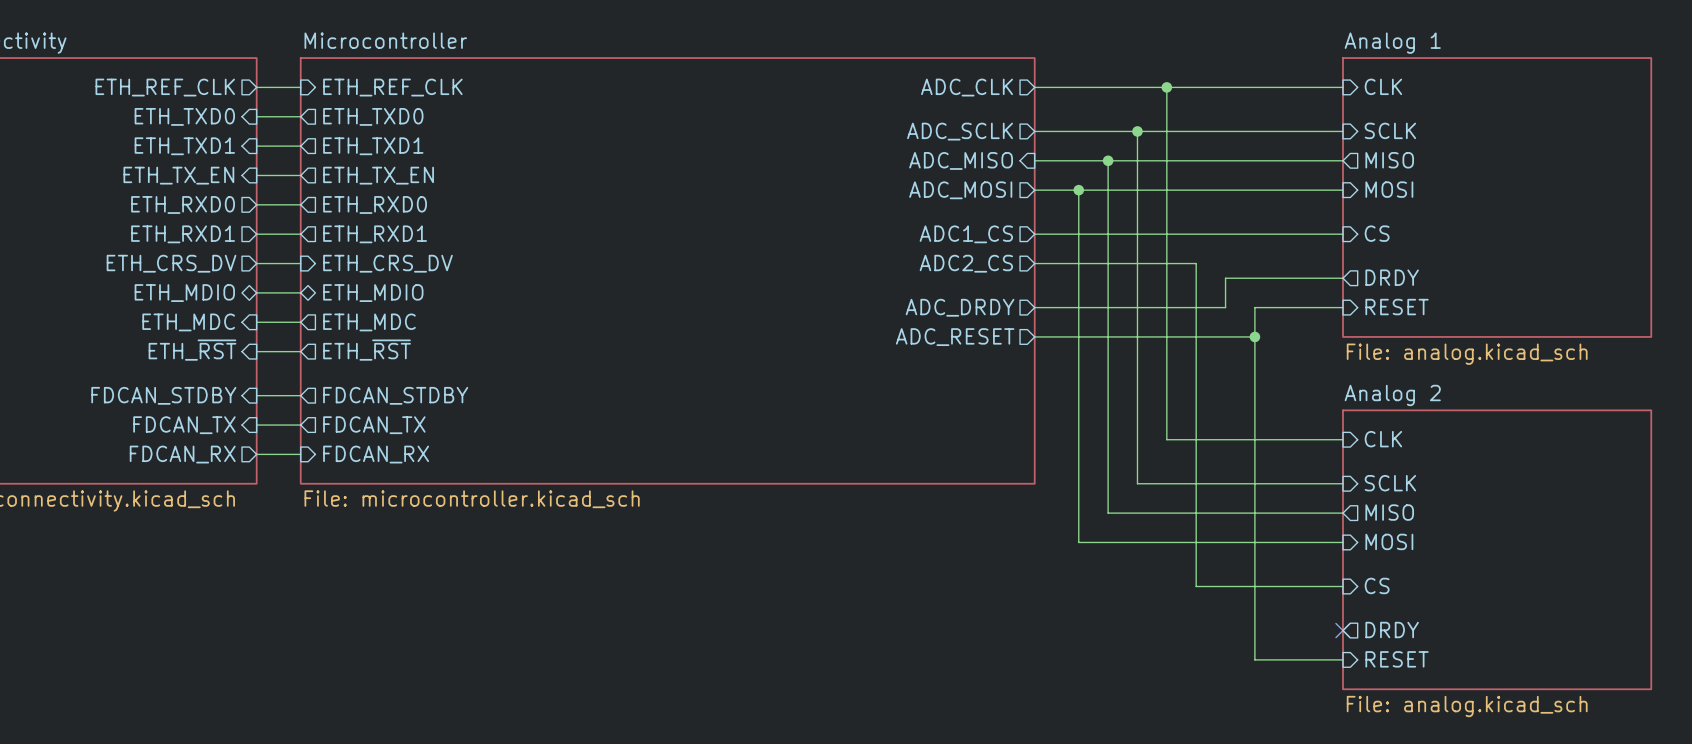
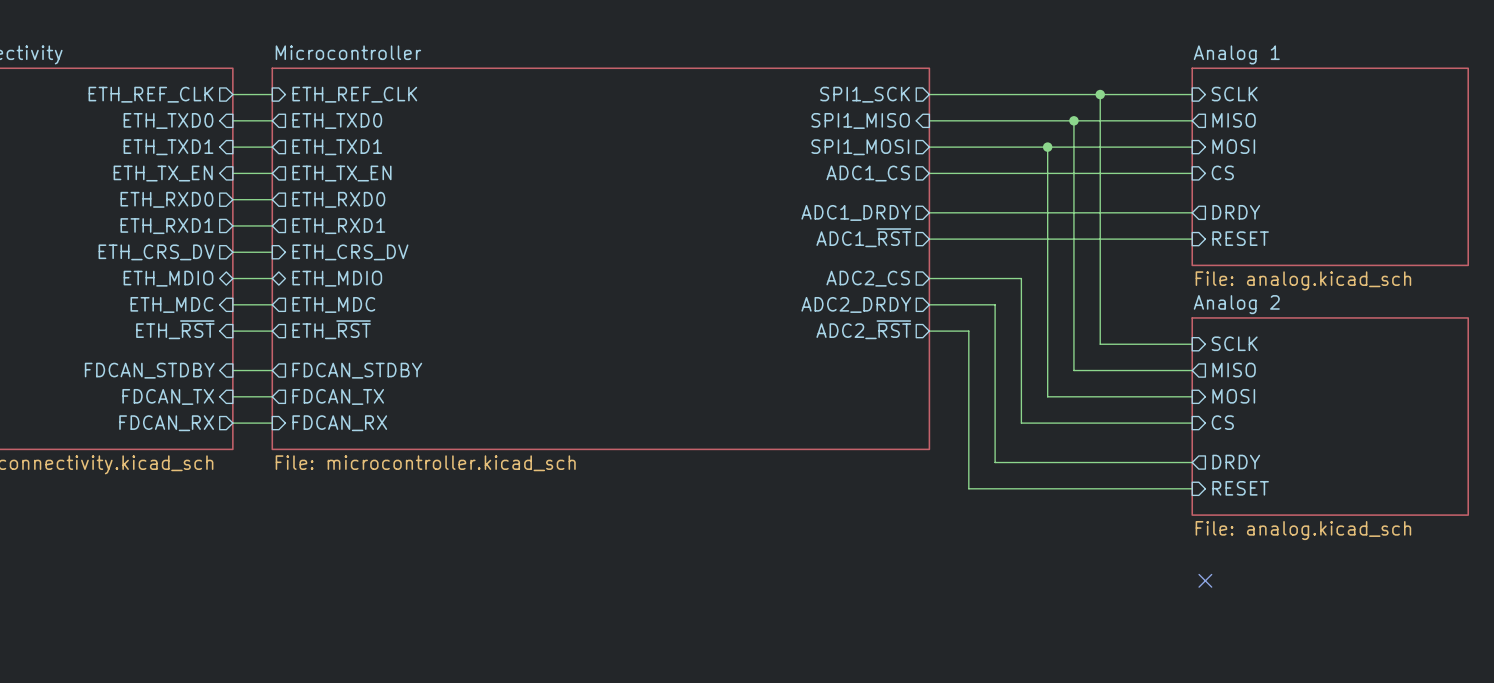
sheet Analog 1 name position: Analog 1 (1392, 43) -> Analog 1 (1236, 54)
sheet Analog 1 shape: [1342, 57, 1653, 338] -> [1191, 67, 1470, 267]
sheet pin: CLK (1383, 86) -> none
sheet pin: ADC_CLK (967, 87) -> SPI1_SCK (865, 94)
wire: (1166, 87) (1166, 146) -> none
junction: (1166, 87) -> none
junction: none -> (1100, 94)
wire: (1328, 87) (1342, 87) -> none
sheet pin: none -> SPI1_MISO (860, 120)
wire: none -> (929, 120) (1192, 120)
junction: none -> (1073, 120)
sheet pin position: SCLK (1390, 130) -> SCLK (1234, 94)
sheet pin: ADC_SCLK (960, 131) -> none
wire: (1034, 131) (1342, 131) -> none
wire: (1137, 131) (1137, 292) -> (929, 278) (1021, 278)
junction: (1137, 131) -> none
sheet pin: none -> SPI1_MOSI (860, 147)
wire: none -> (929, 147) (1192, 147)
junction: none -> (1047, 147)
sheet pin: ADC_MISO (961, 160) -> none
wire: (1034, 160) (1342, 160) -> none
wire: (1108, 160) (1108, 322) -> (929, 304) (995, 304)
junction: (1108, 160) -> none
sheet pin position: MISO (1389, 160) -> MISO (1234, 120)
wire: none -> (929, 173) (1192, 173)
sheet pin position: MOSI (1389, 189) -> MOSI (1233, 146)
sheet pin: ADC_MOSI (960, 190) -> none
wire: (1034, 190) (1342, 190) -> none
wire: (1078, 190) (1078, 351) -> (929, 331) (968, 331)
junction: (1078, 190) -> none
sheet pin: none -> ADC1_DRDY (856, 212)
wire: none -> (929, 212) (1192, 212)
sheet pin position: CS (1377, 233) -> CS (1222, 172)
sheet pin position: ADC1_CS (966, 234) -> ADC1_CS (868, 173)
wire: (1034, 234) (1342, 234) -> none
sheet pin: none -> ADC1_~{RST} (863, 237)
wire: none -> (929, 239) (1192, 239)
sheet pin position: ADC2_CS (966, 263) -> ADC2_CS (868, 278)
wire: (1034, 263) (1196, 263) -> (1073, 120) (1073, 252)
sheet pin position: DRDY (1392, 277) -> DRDY (1236, 212)
wire: (1225, 278) (1342, 278) -> (1100, 265) (1100, 94)
sheet pin: ADC_DRDY (960, 307) -> ADC2_DRDY (856, 304)
wire: (1034, 307) (1225, 307) -> (1192, 344) (1100, 344) (1100, 291)
wire: (1342, 307) (1254, 307) (1254, 659) (1342, 659) -> none
sheet pin position: RESET (1397, 307) -> RESET (1240, 238)
wire: (1034, 336) (1254, 336) -> none
junction: (1254, 336) -> none
sheet pin: ADC_RESET (955, 337) -> ADC2_~{RST} (863, 329)
sheet Analog 1 value position: File: analog.kicad_sch (1467, 354) -> File: analog.kicad_sch (1303, 280)
sheet pin: none -> SCLK (1234, 343)
wire: (1196, 395) (1196, 586) (1342, 586) -> (1073, 370) (1192, 370)
sheet pin: none -> MISO (1234, 370)
sheet Analog 2 name position: Analog 2 (1392, 395) -> Analog 2 (1236, 304)
sheet Analog 2 shape: [1342, 409, 1653, 691] -> [1191, 317, 1470, 516]
sheet pin: none -> MOSI (1233, 396)
wire: (1166, 425) (1166, 439) (1342, 439) -> (1047, 396) (1192, 396)
sheet pin: CLK (1383, 439) -> none
sheet pin: none -> CS (1222, 422)
wire: (1137, 454) (1137, 483) (1342, 483) -> (1021, 423) (1192, 423)
sheet pin: SCLK (1390, 483) -> none
sheet pin: none -> DRDY (1236, 462)
wire: (1108, 498) (1108, 513) (1342, 513) -> (995, 462) (1192, 462)
sheet pin: MISO (1389, 512) -> none
wire: (1078, 527) (1078, 542) (1342, 542) -> (968, 488) (1192, 488)
sheet pin: none -> RESET (1240, 488)
sheet pin: MOSI (1389, 541) -> none
sheet pin: CS (1377, 585) -> none
sheet pin: DRDY (1392, 630) -> none
sheet pin: RESET (1397, 659) -> none
sheet Analog 2 value position: File: analog.kicad_sch (1467, 706) -> File: analog.kicad_sch (1303, 530)

